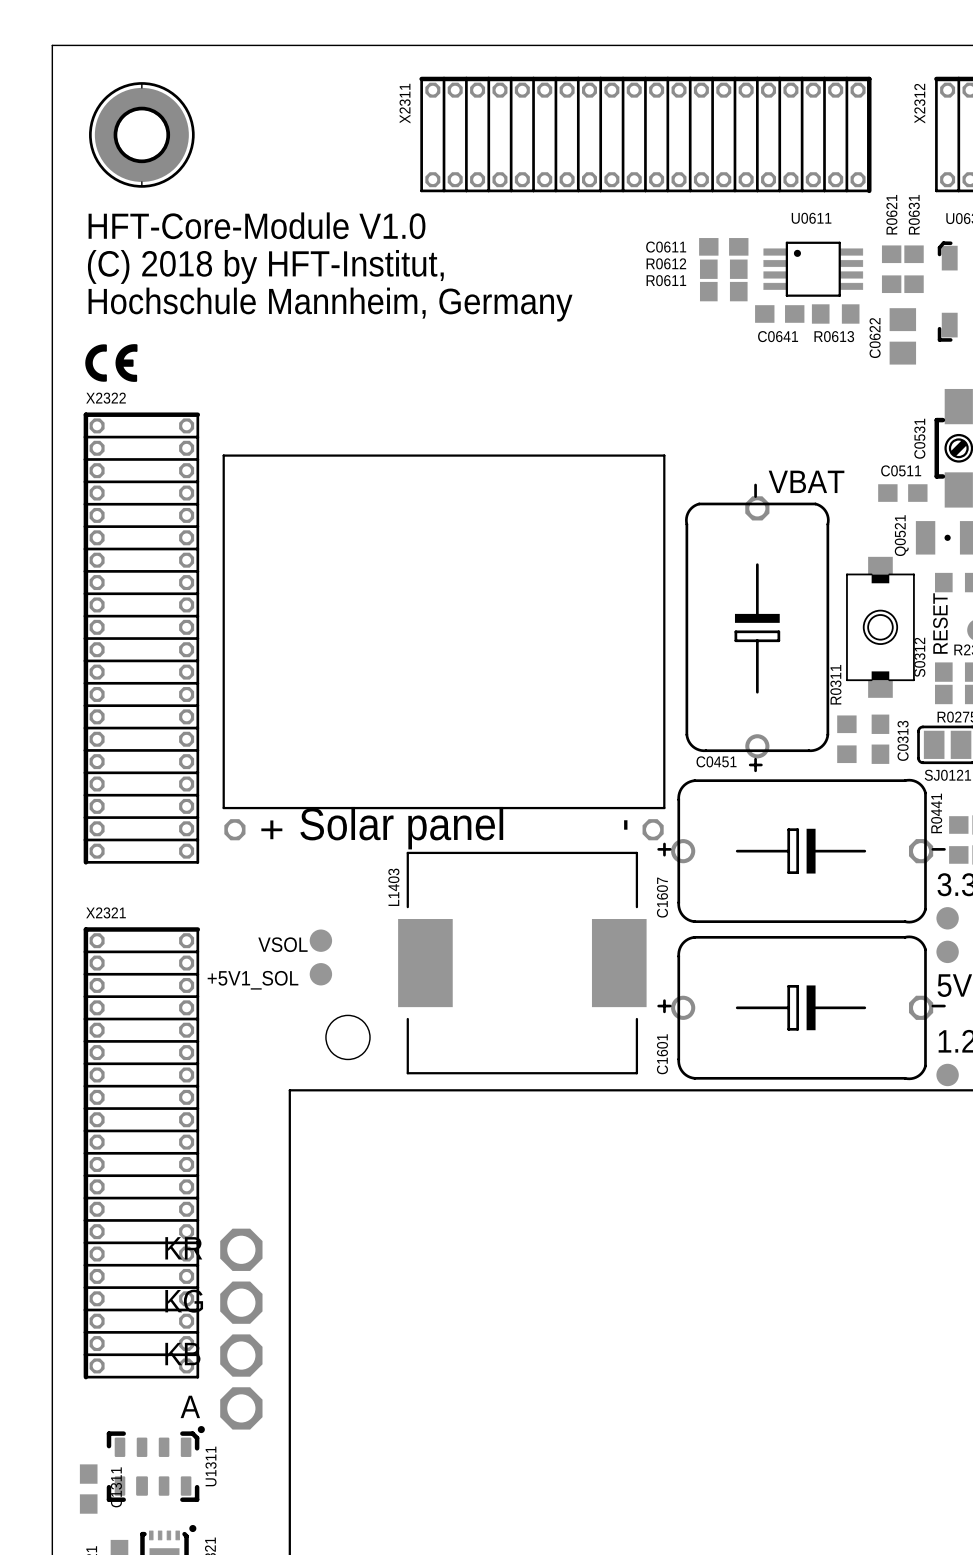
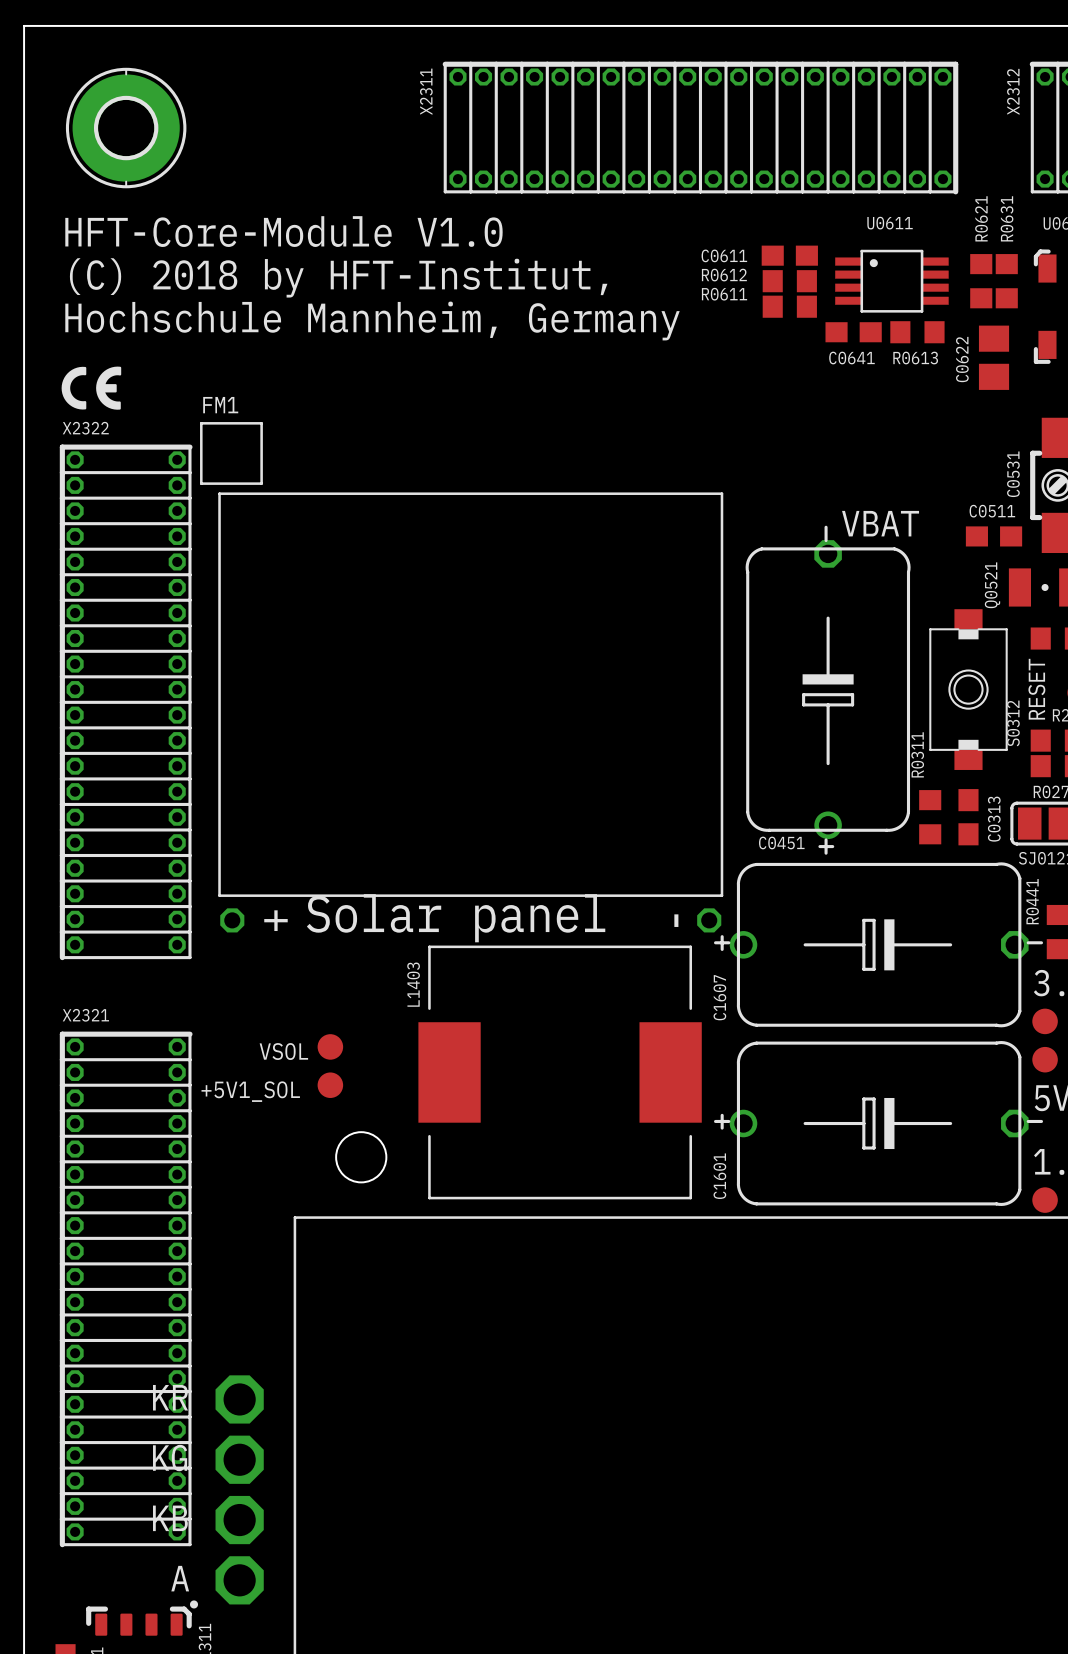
FM1: none -> (231, 453)

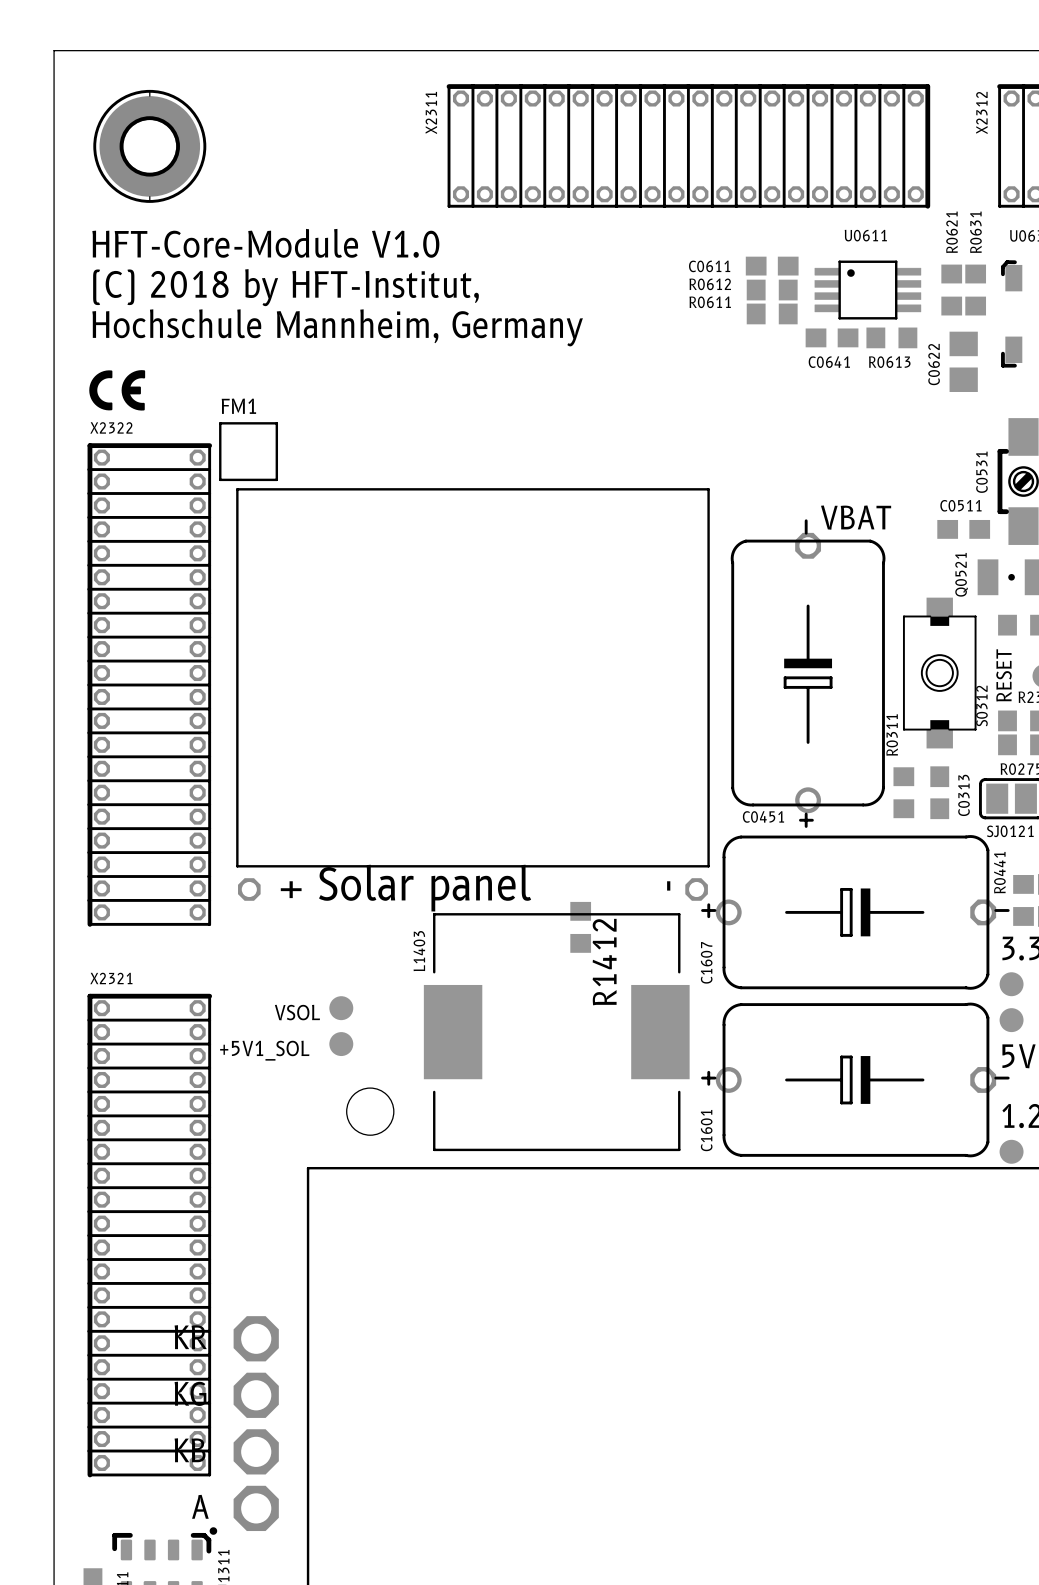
R1412: none -> (580, 927)

